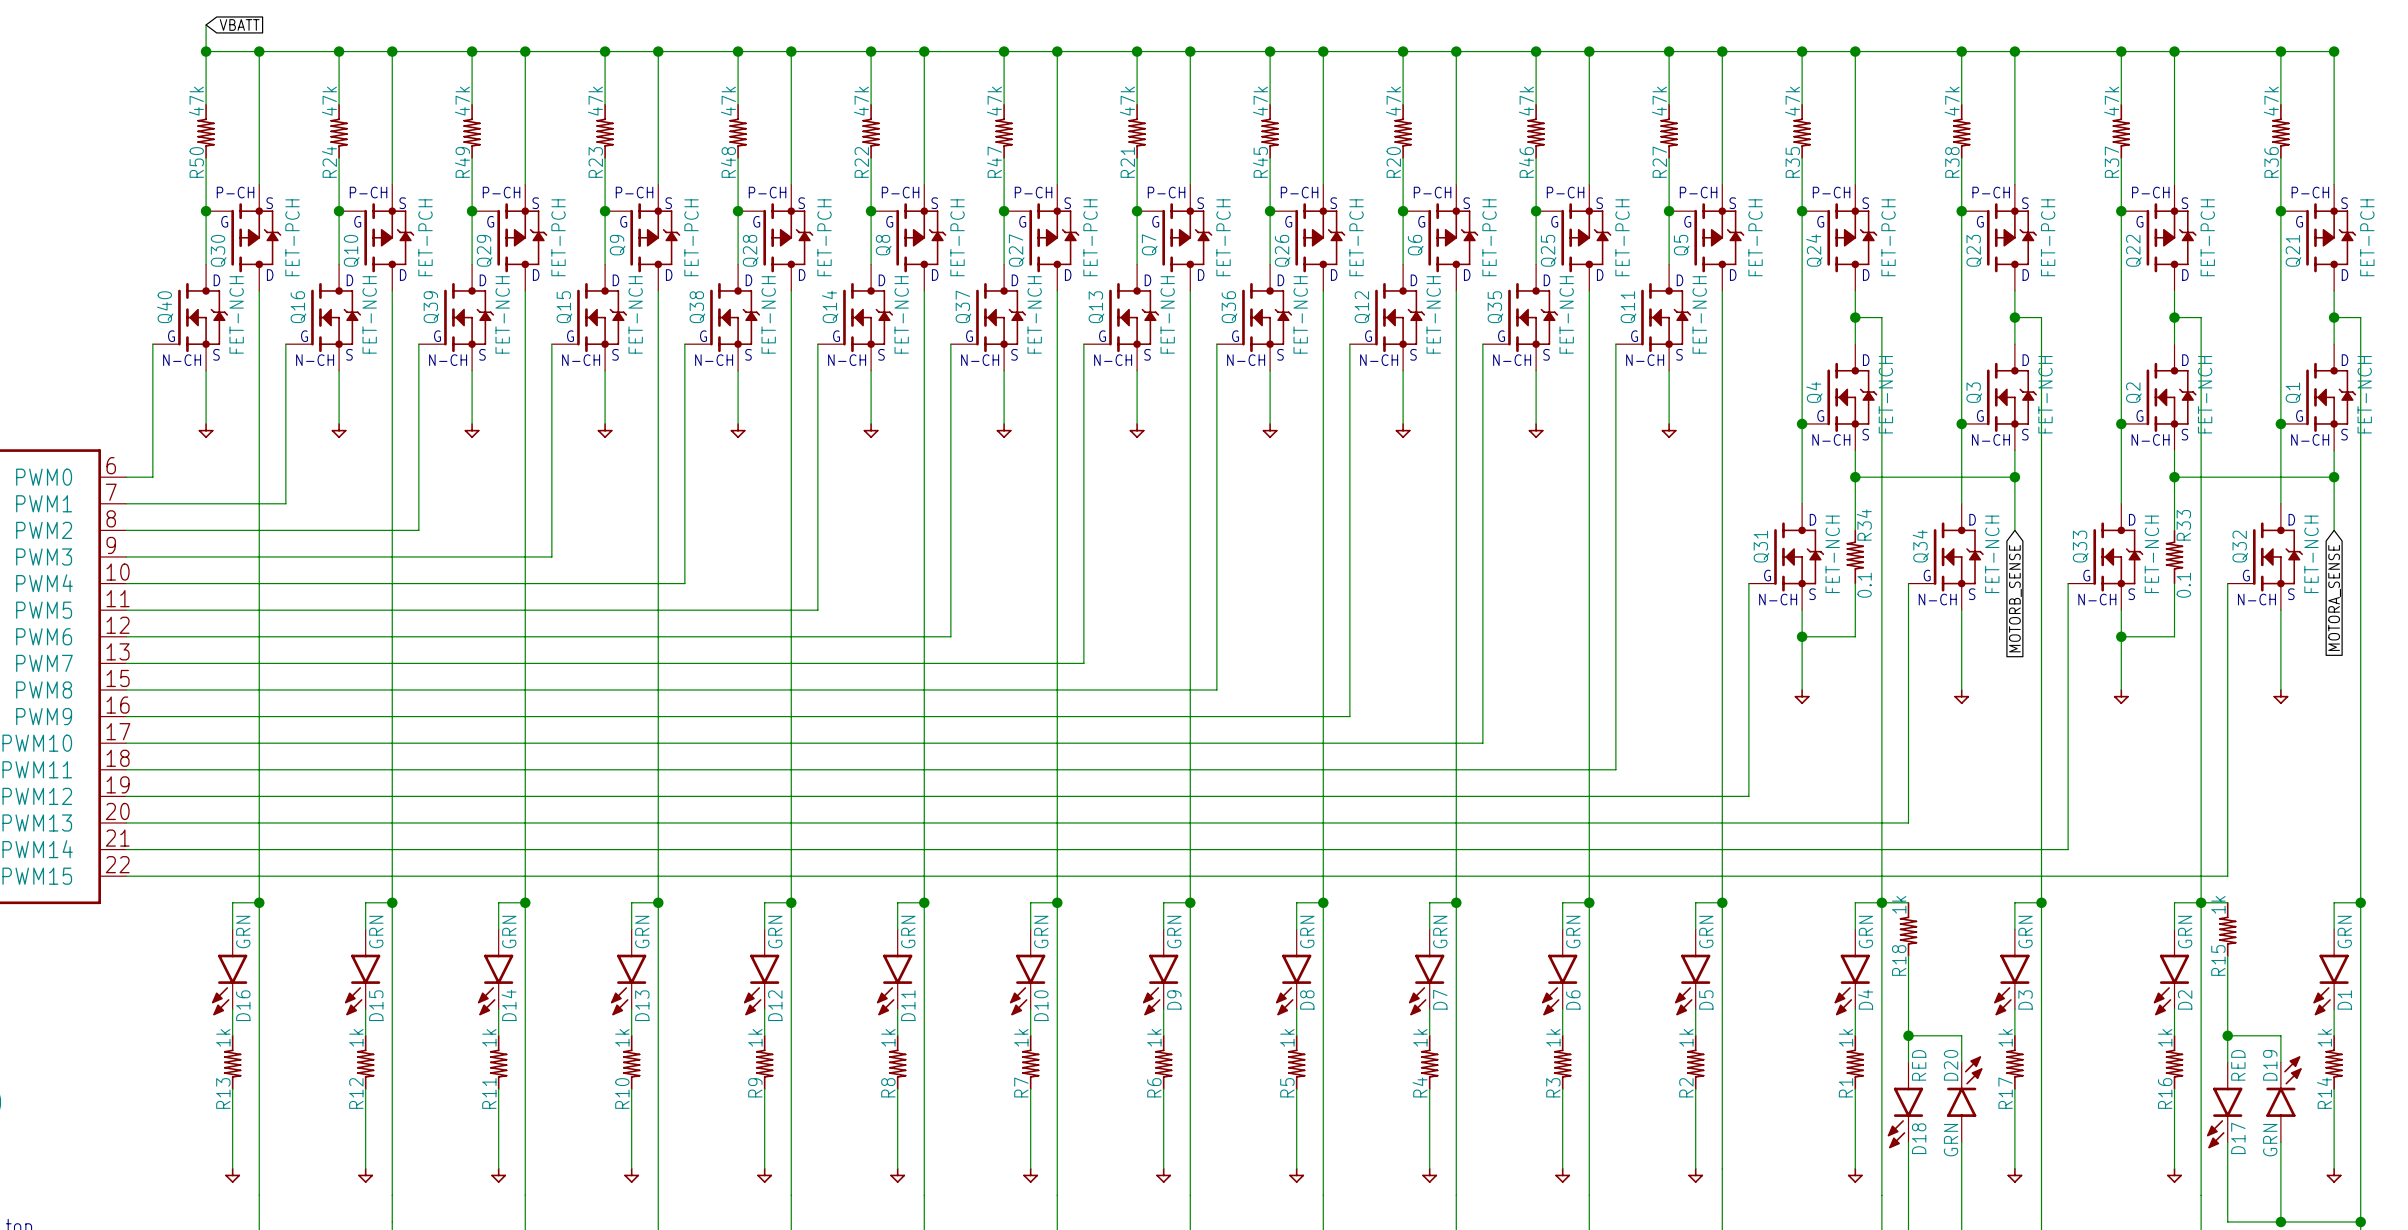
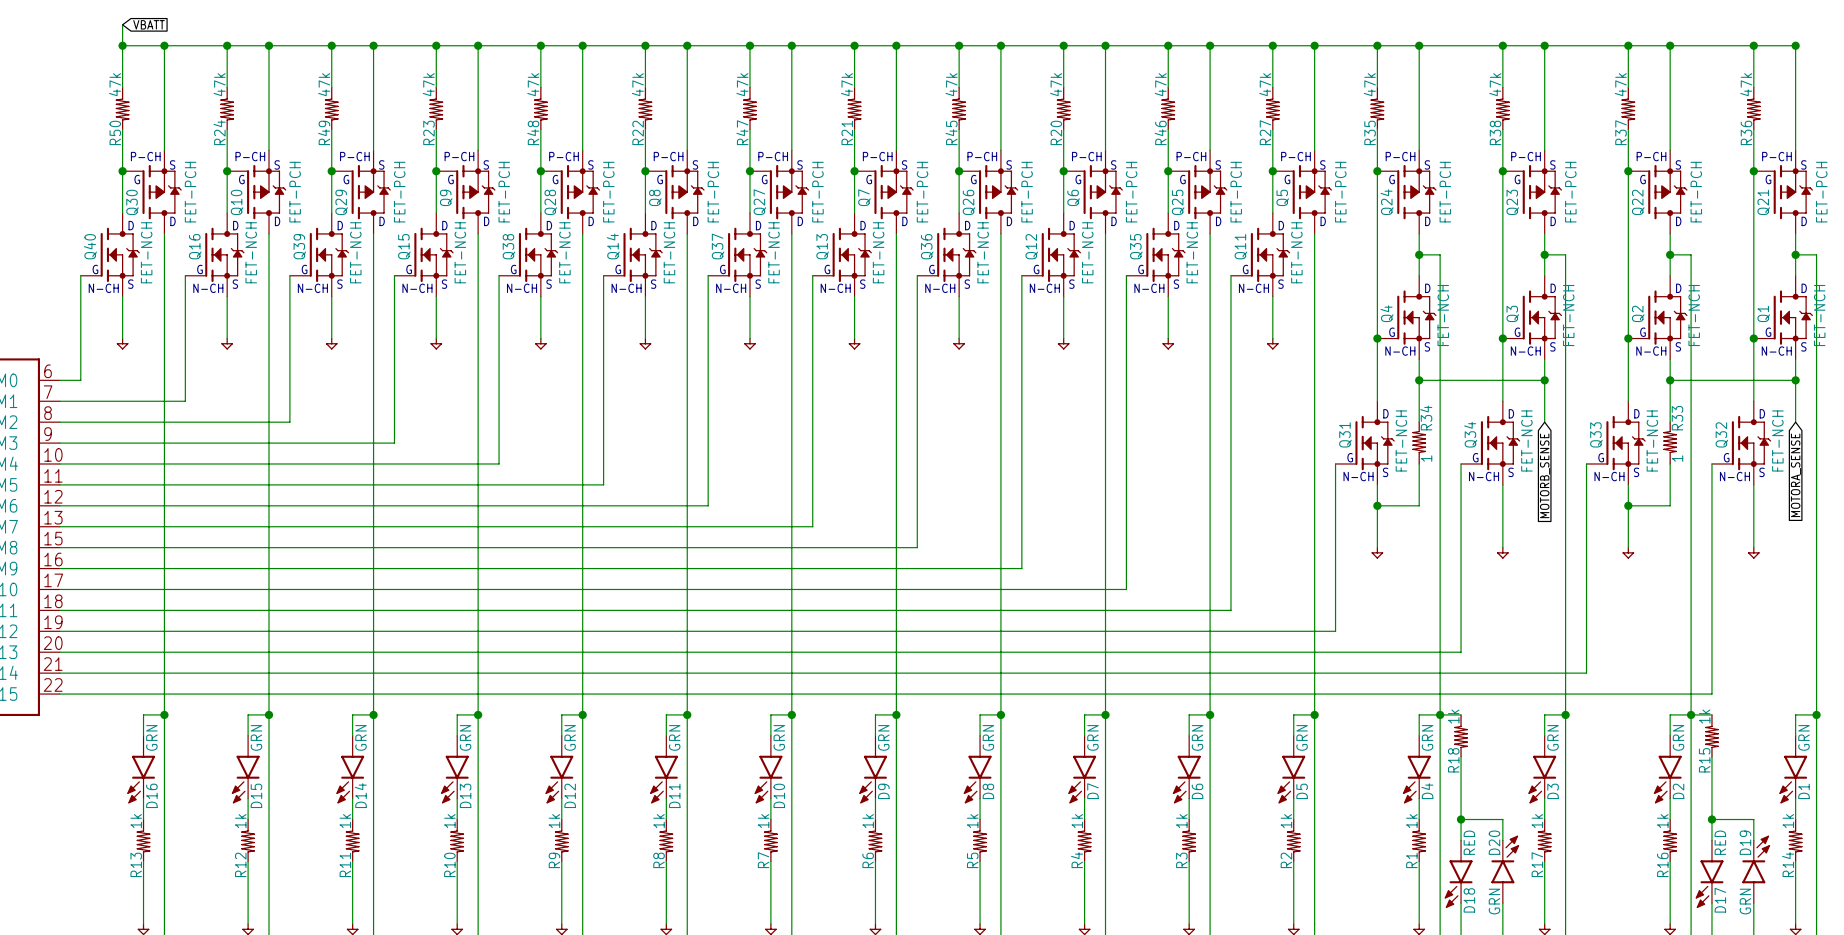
R34 value: 0.1 (1864, 585) -> 1 (1426, 458)
R33 value: 0.1 (2183, 585) -> 1 (1677, 458)

